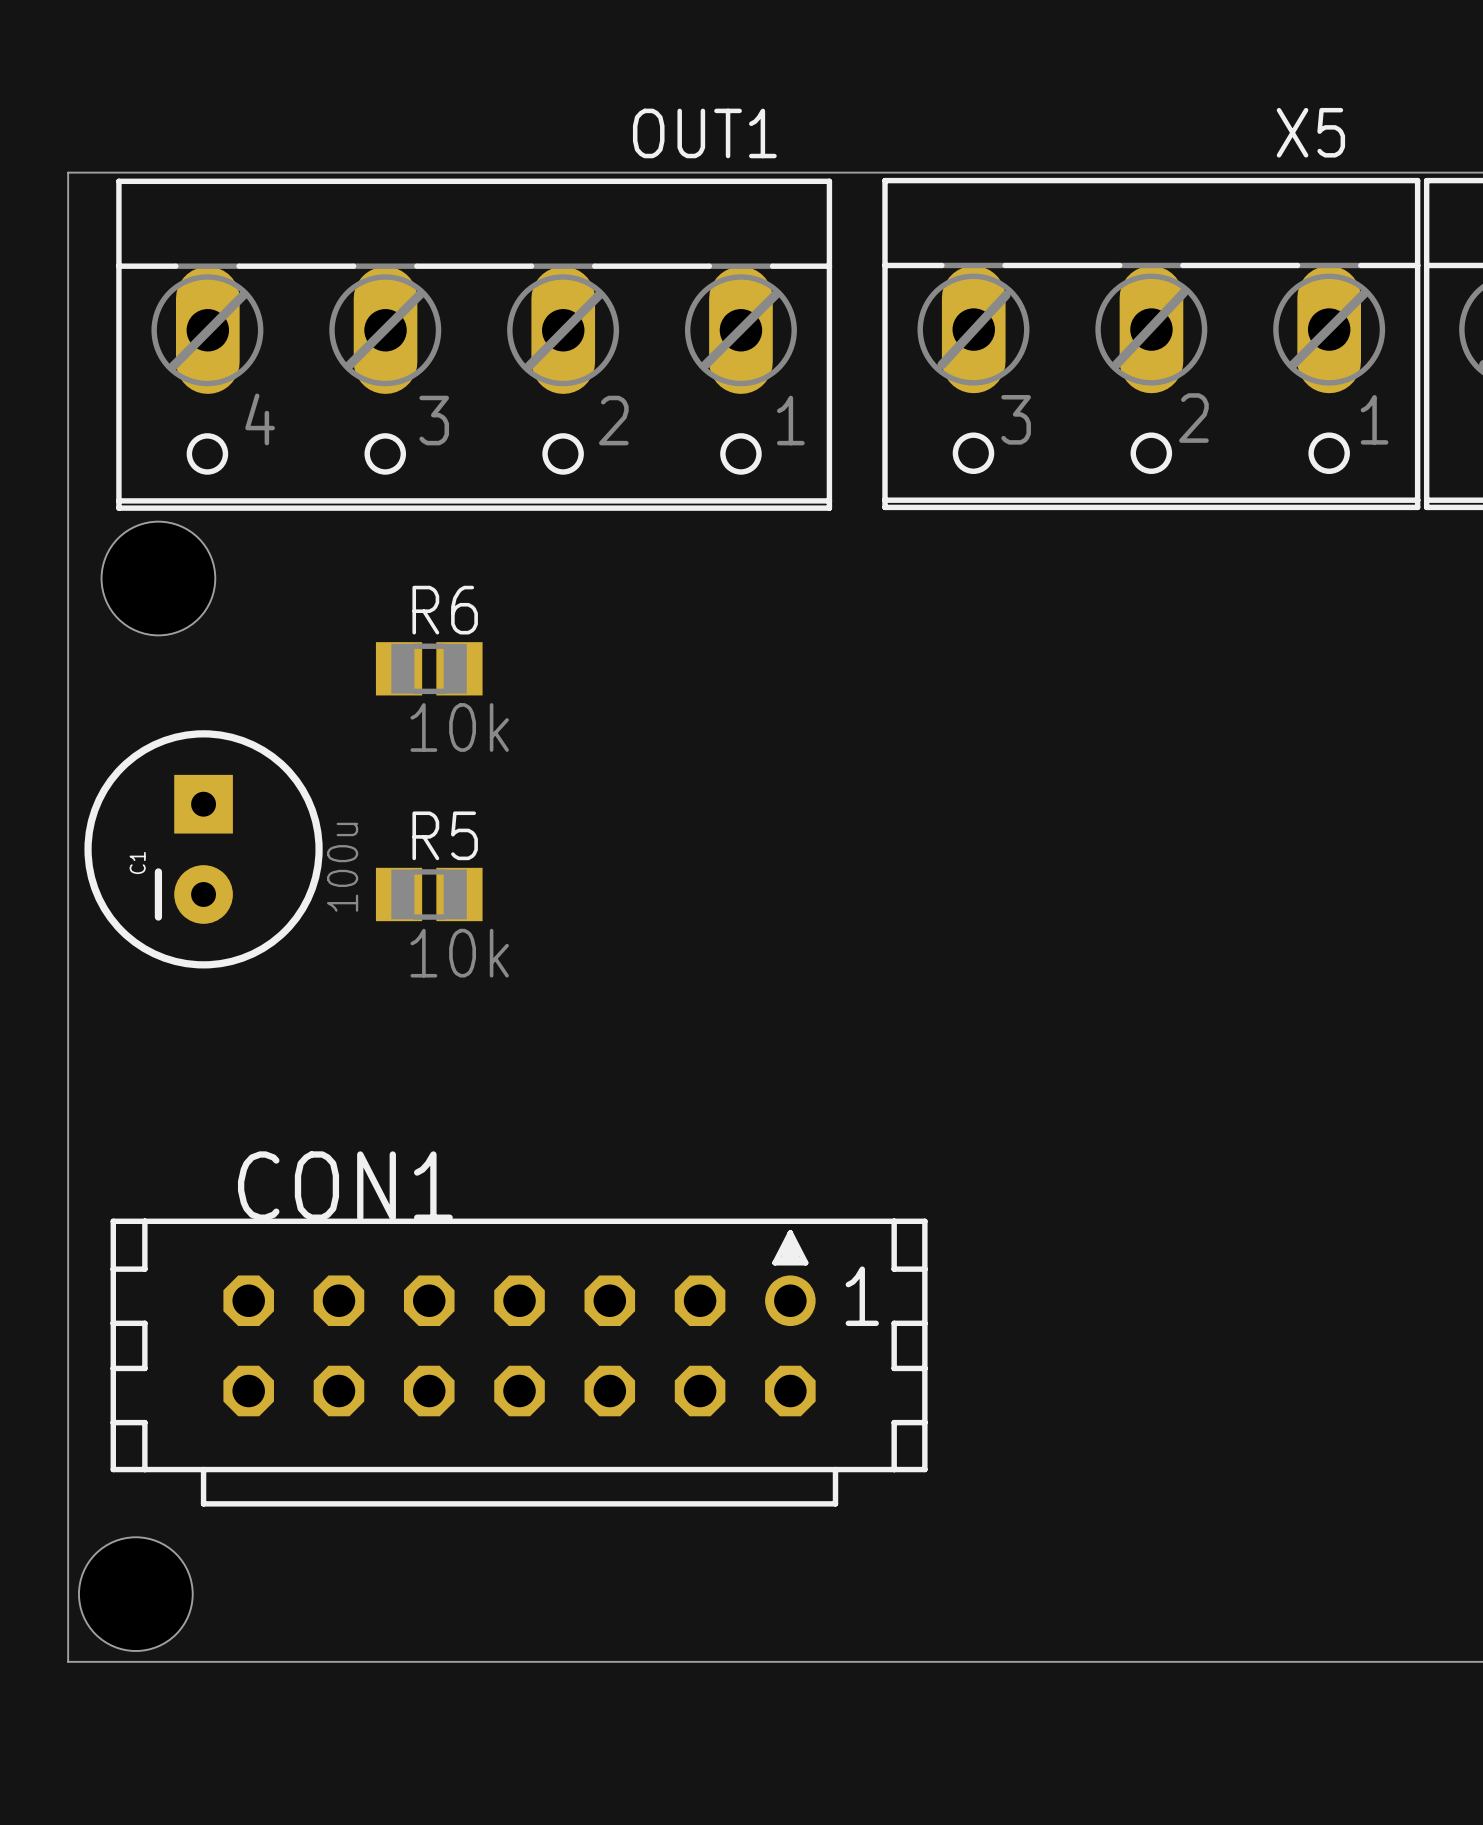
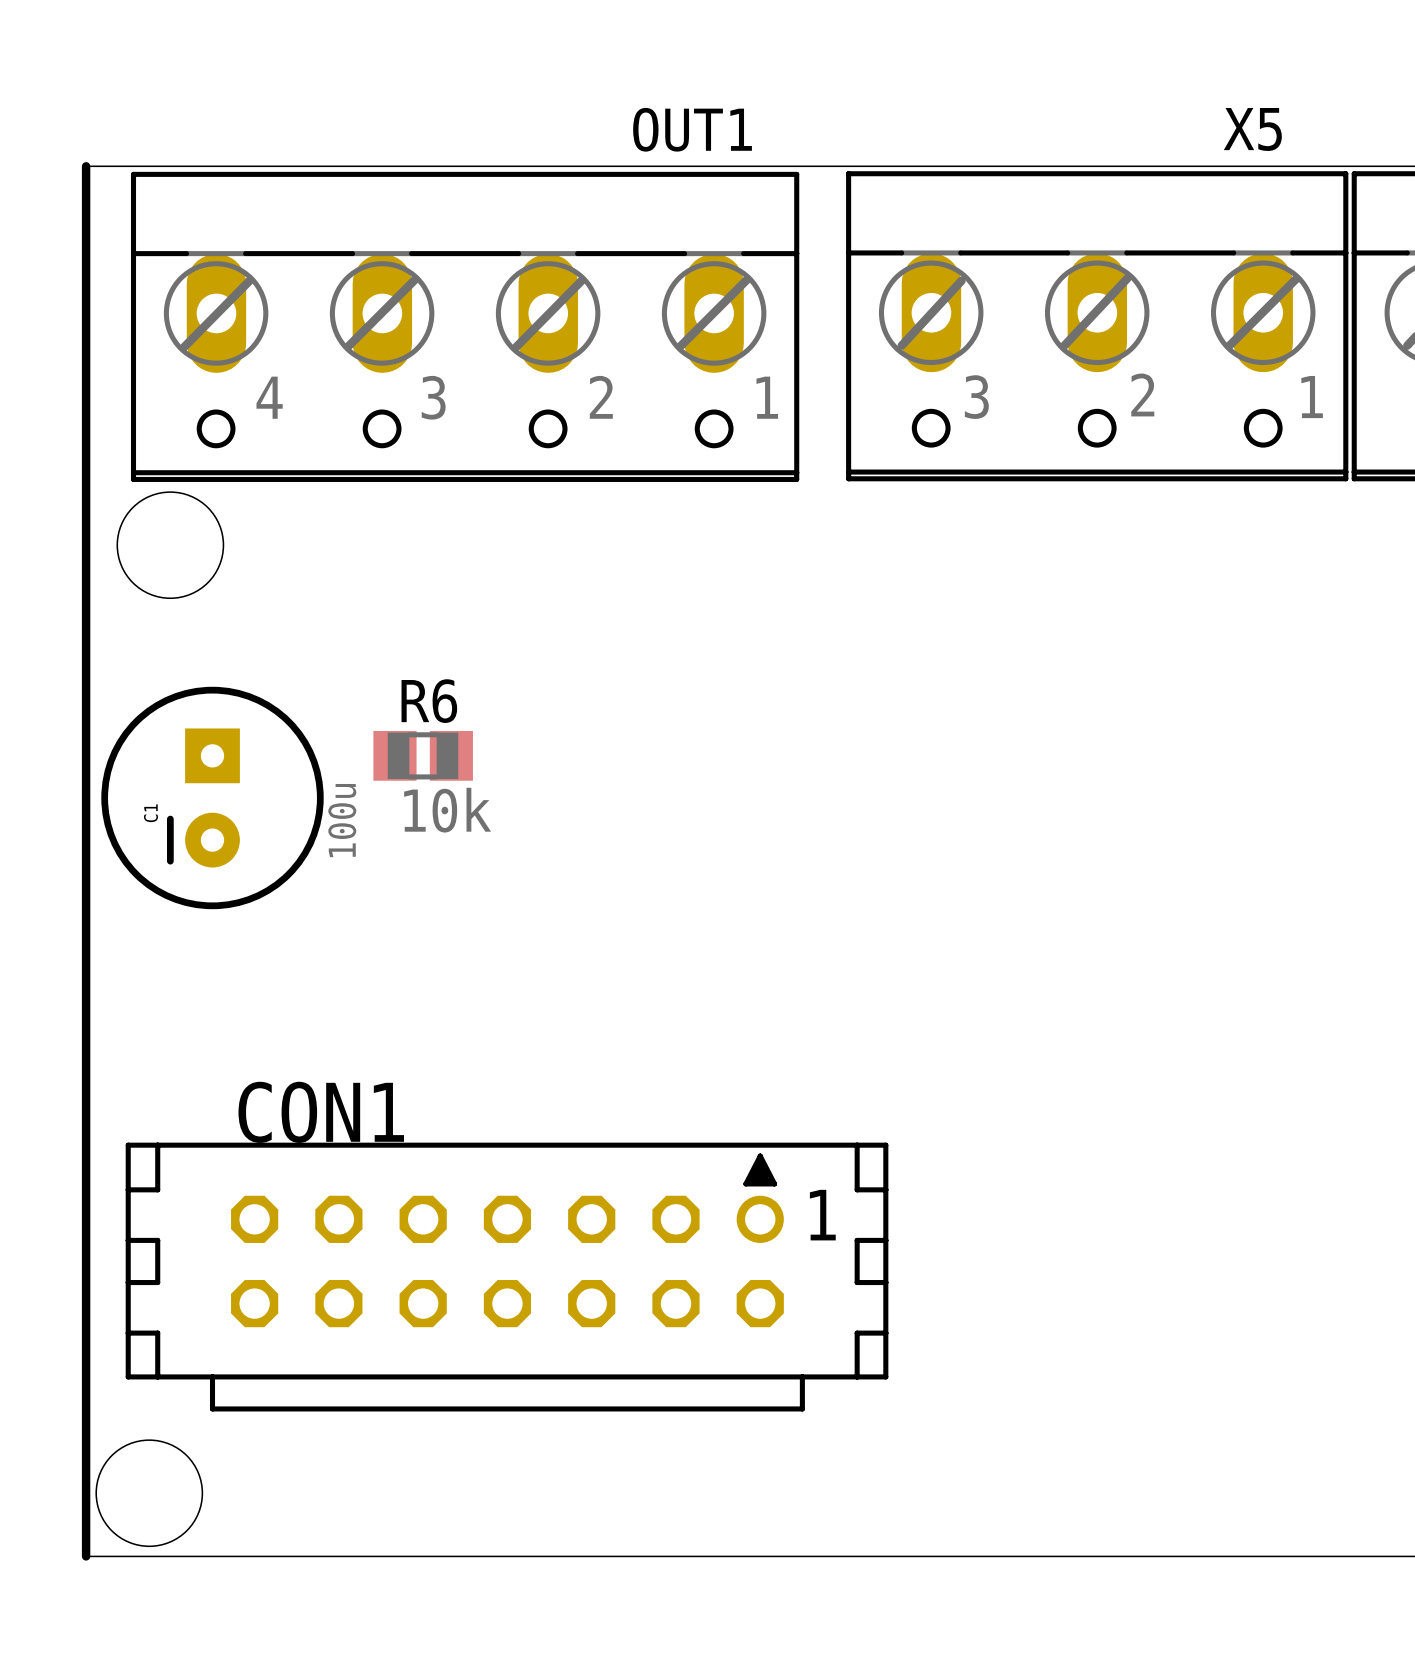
board edge width: thin (68, 172) (68, 1661) -> thick (86, 166) (86, 1556)
R6 position: (429, 668) -> (423, 755)
R5: 10k (429, 894) -> none

